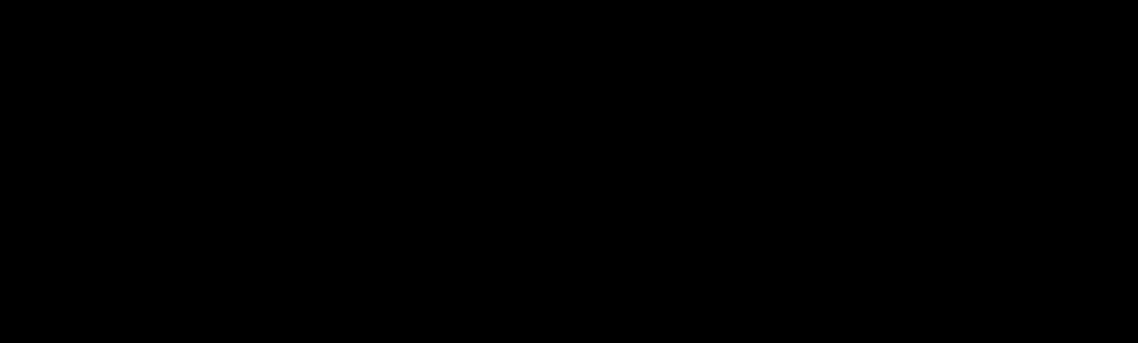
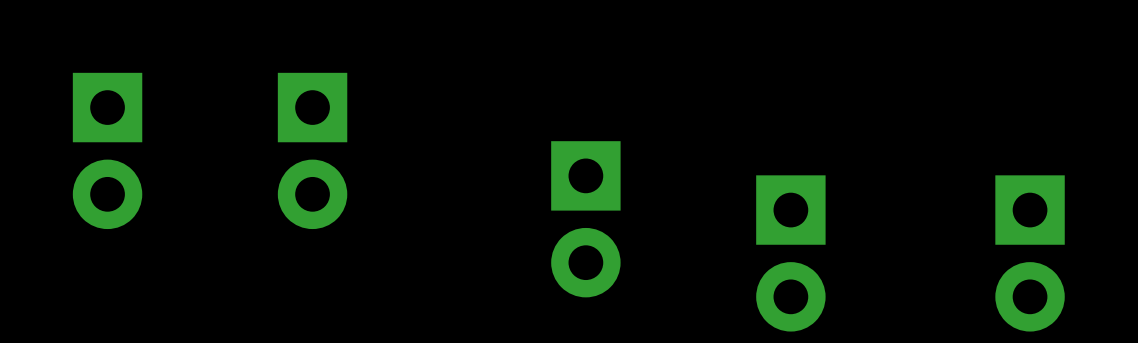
part: none -> (107, 150)
part: none -> (312, 150)
part: none -> (585, 219)
part: none -> (790, 253)
part: none -> (1030, 253)

